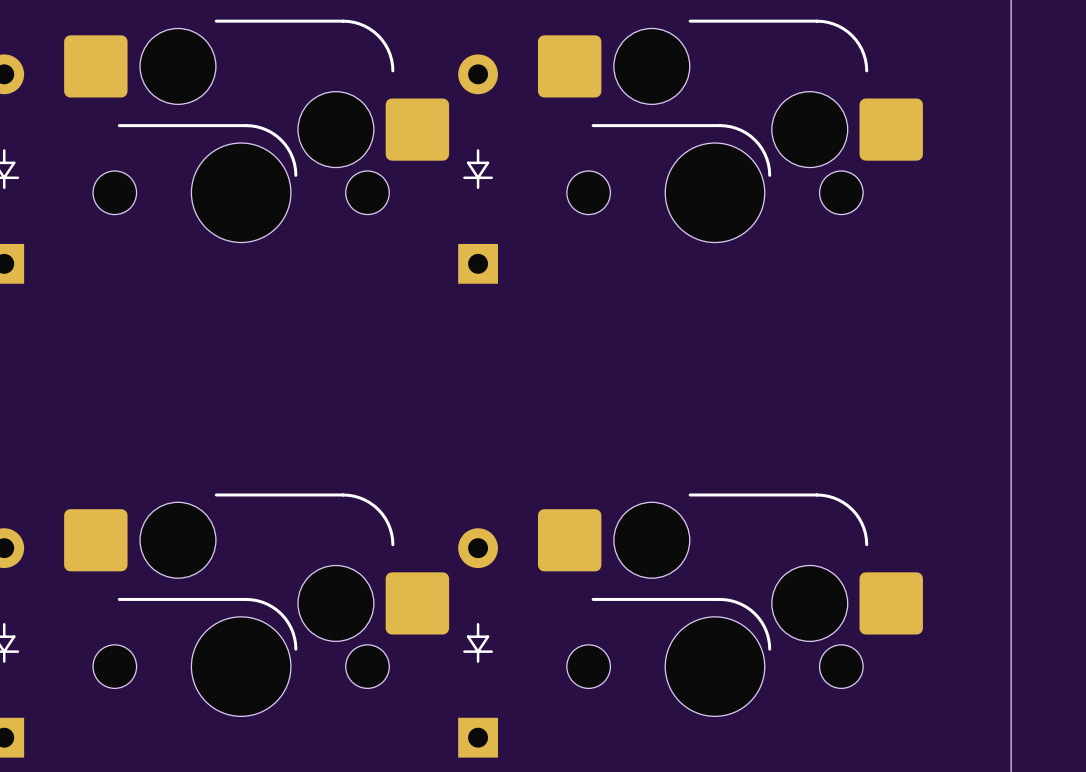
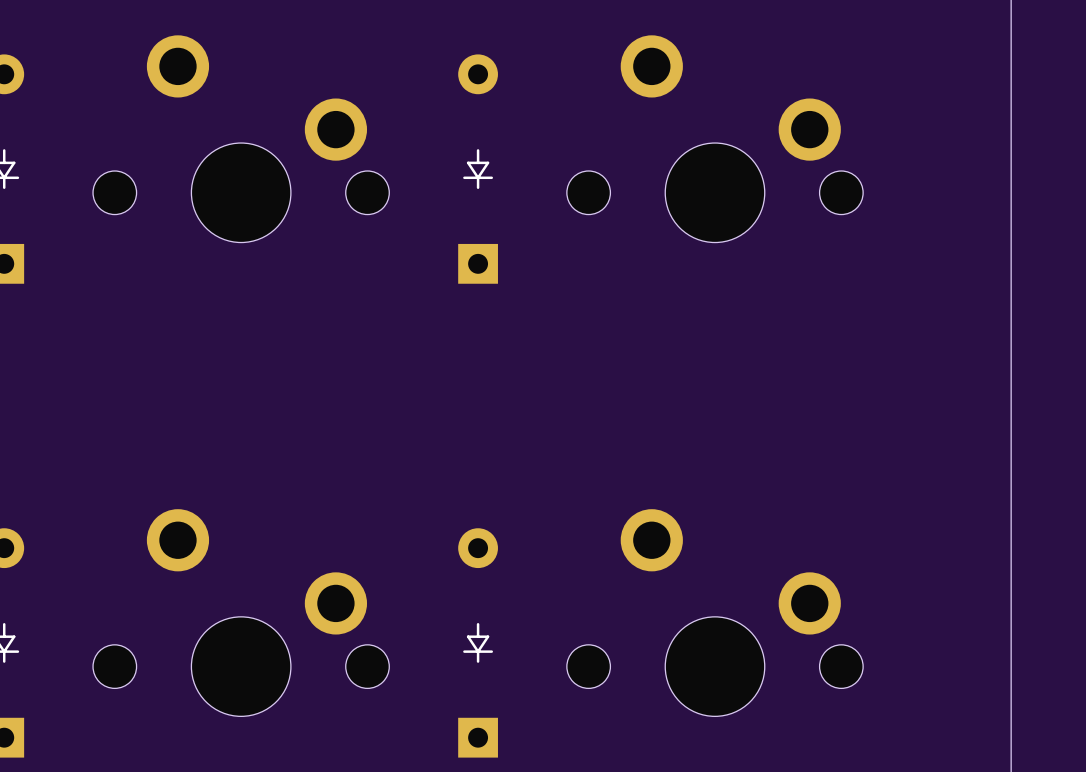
part footprint: [64, 19, 450, 243] -> [93, 35, 390, 243]
part footprint: [537, 19, 923, 243] -> [566, 35, 864, 243]
part footprint: [64, 493, 450, 717] -> [93, 509, 390, 717]
part footprint: [537, 493, 923, 717] -> [566, 509, 864, 717]

